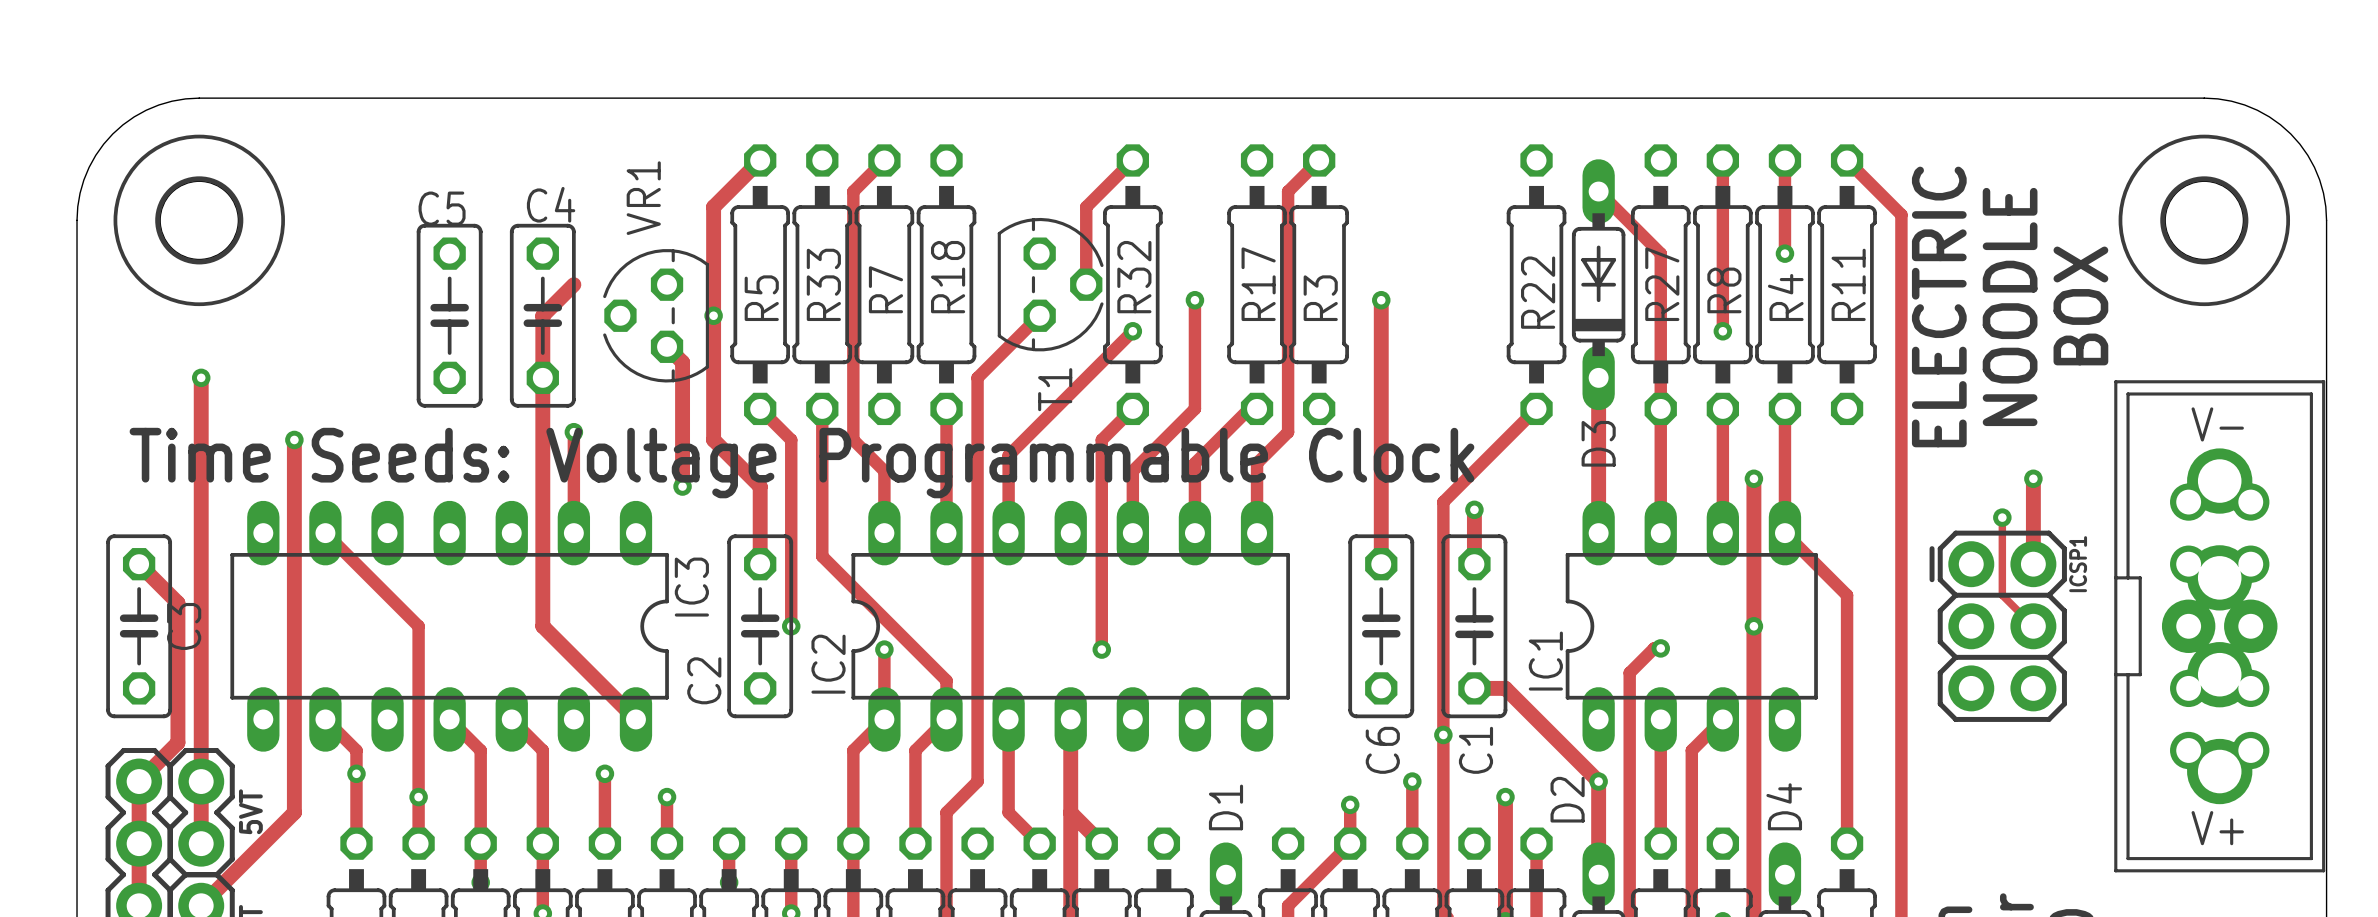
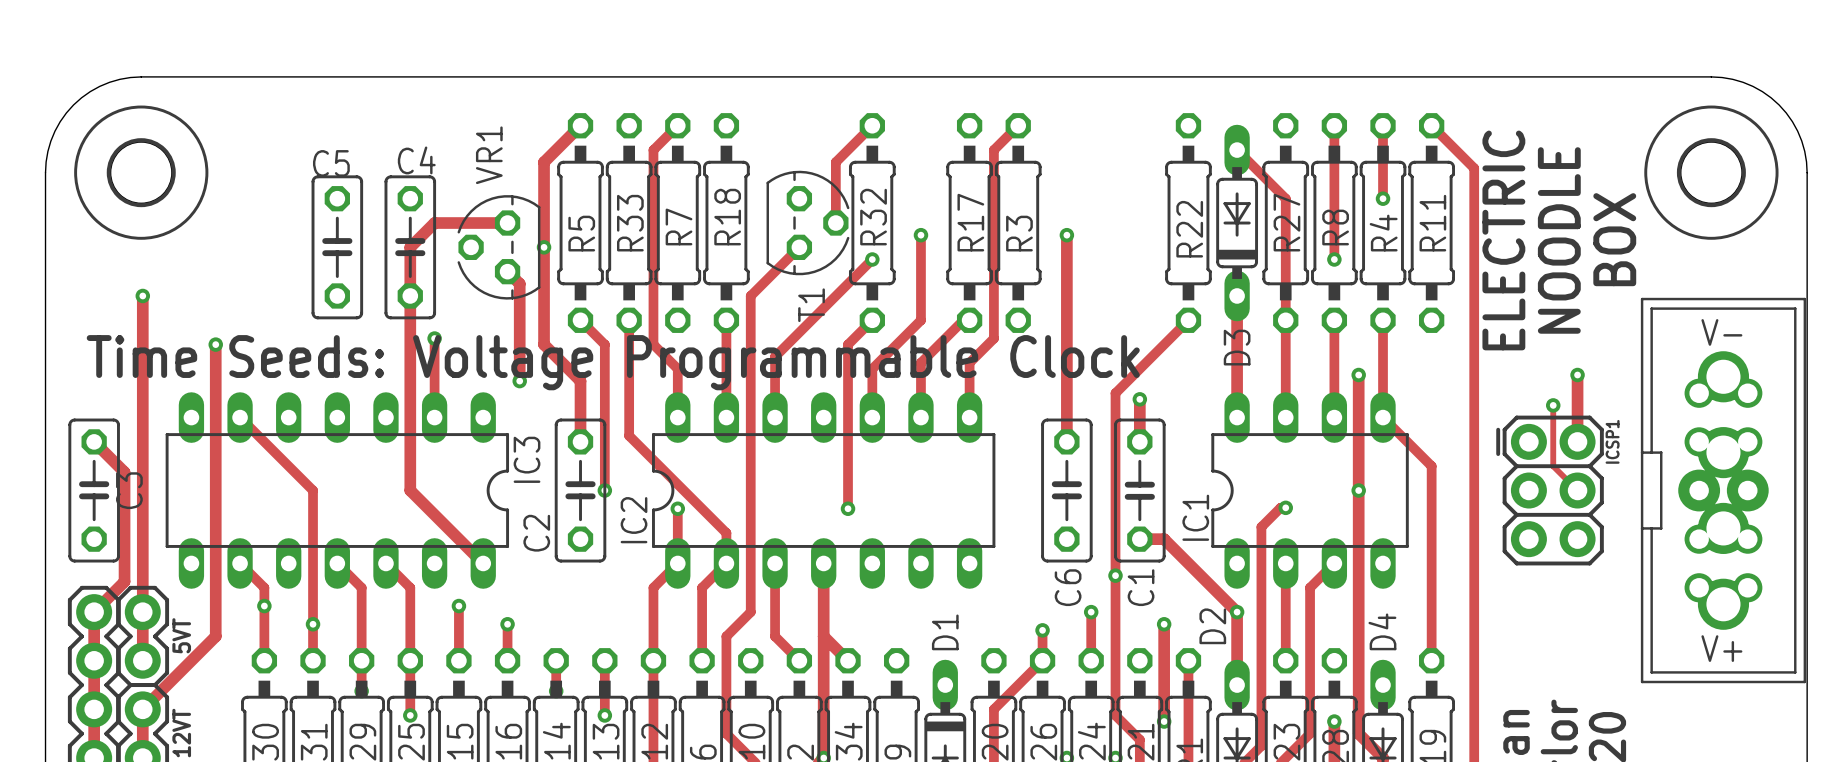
track: none -> (434, 223) (507, 223)

